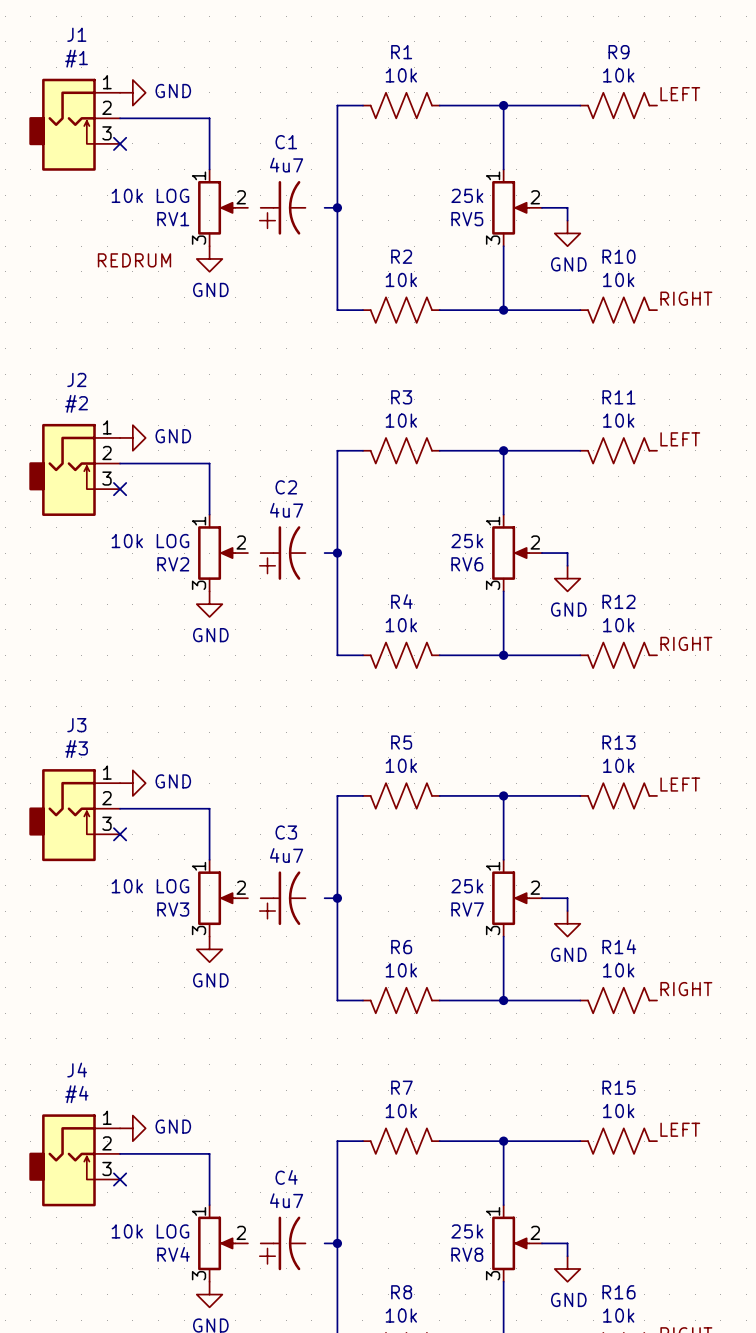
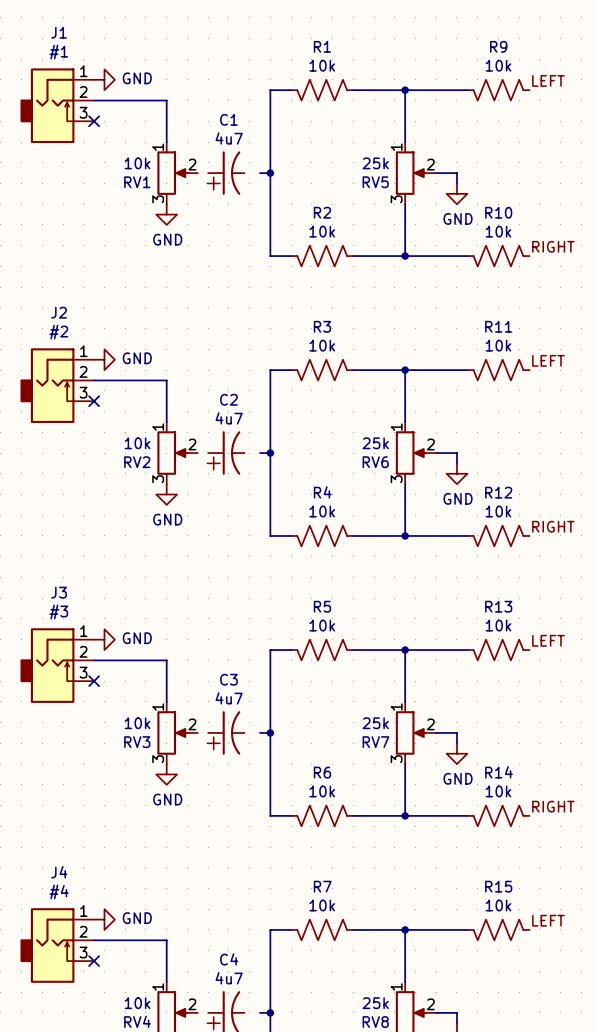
RV1 value: 10k LOG (150, 195) -> 10k (137, 163)
label: REDRUM (134, 260) -> none
RV2 value: 10k LOG (150, 541) -> 10k (137, 443)
RV3 value: 10k LOG (150, 886) -> 10k (137, 723)
RV4 value: 10k LOG (150, 1231) -> 10k (137, 1003)

